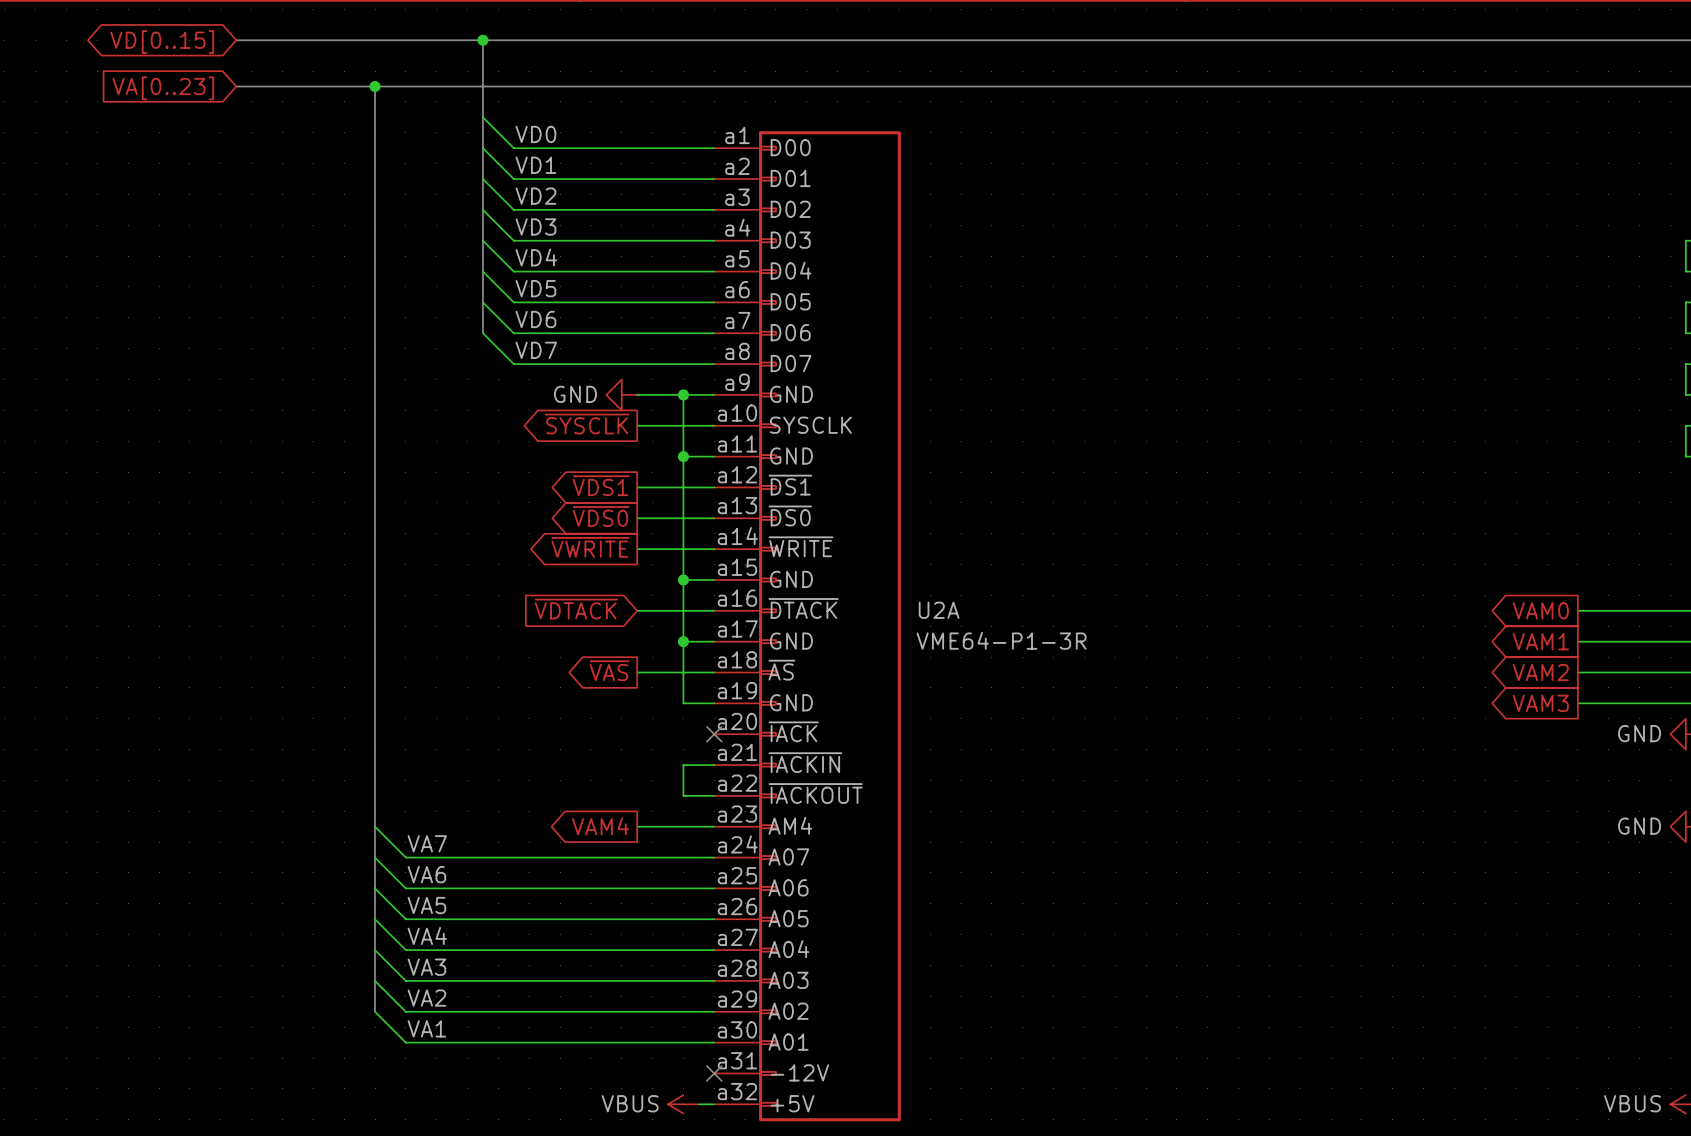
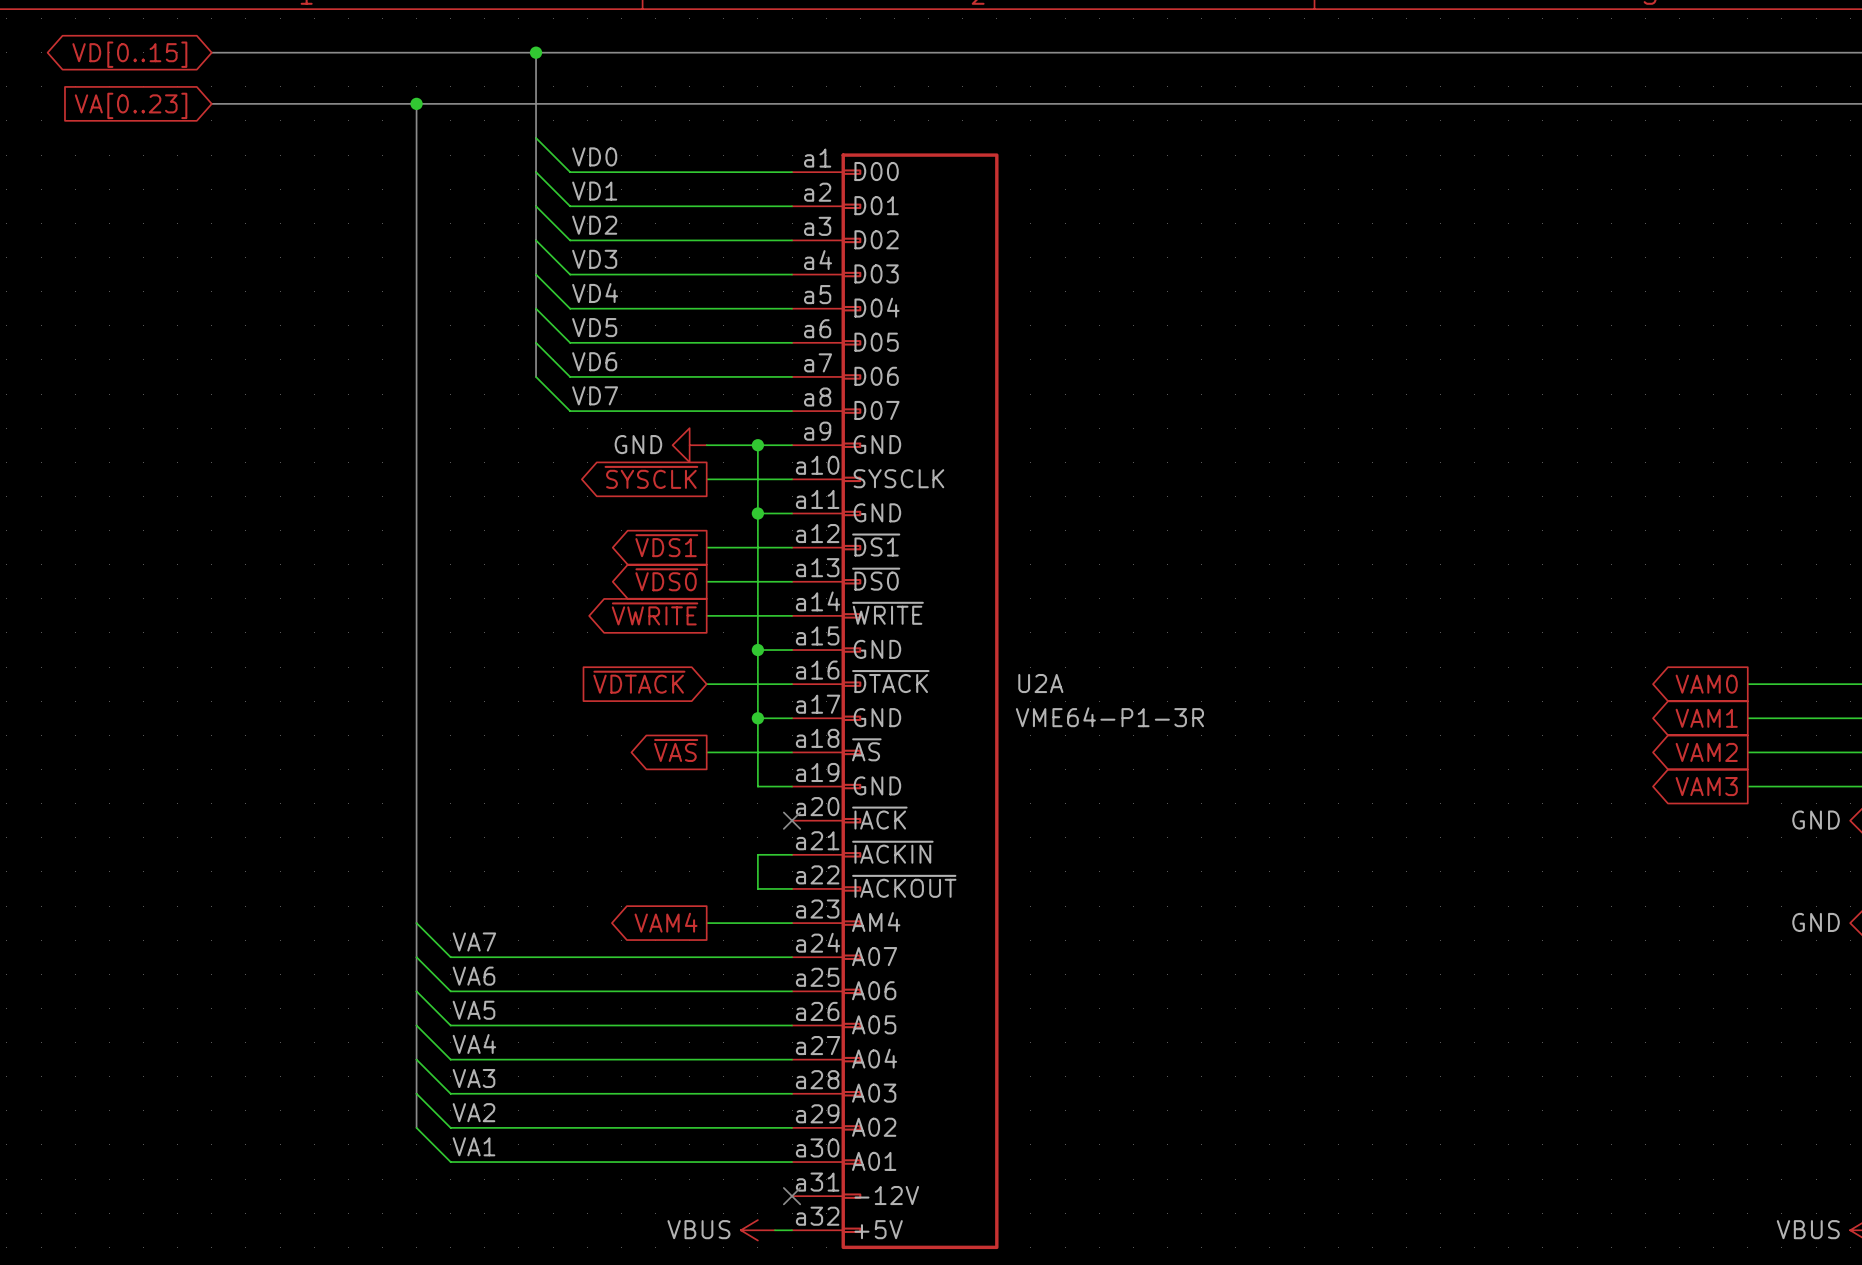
bus: none -> (211, 52) (262, 52)
global label position: VD[0..15] (162, 42) -> VD[0..15] (129, 54)
bus: none -> (211, 103) (262, 103)
global label position: VA[0..23] (163, 88) -> VA[0..23] (131, 105)

